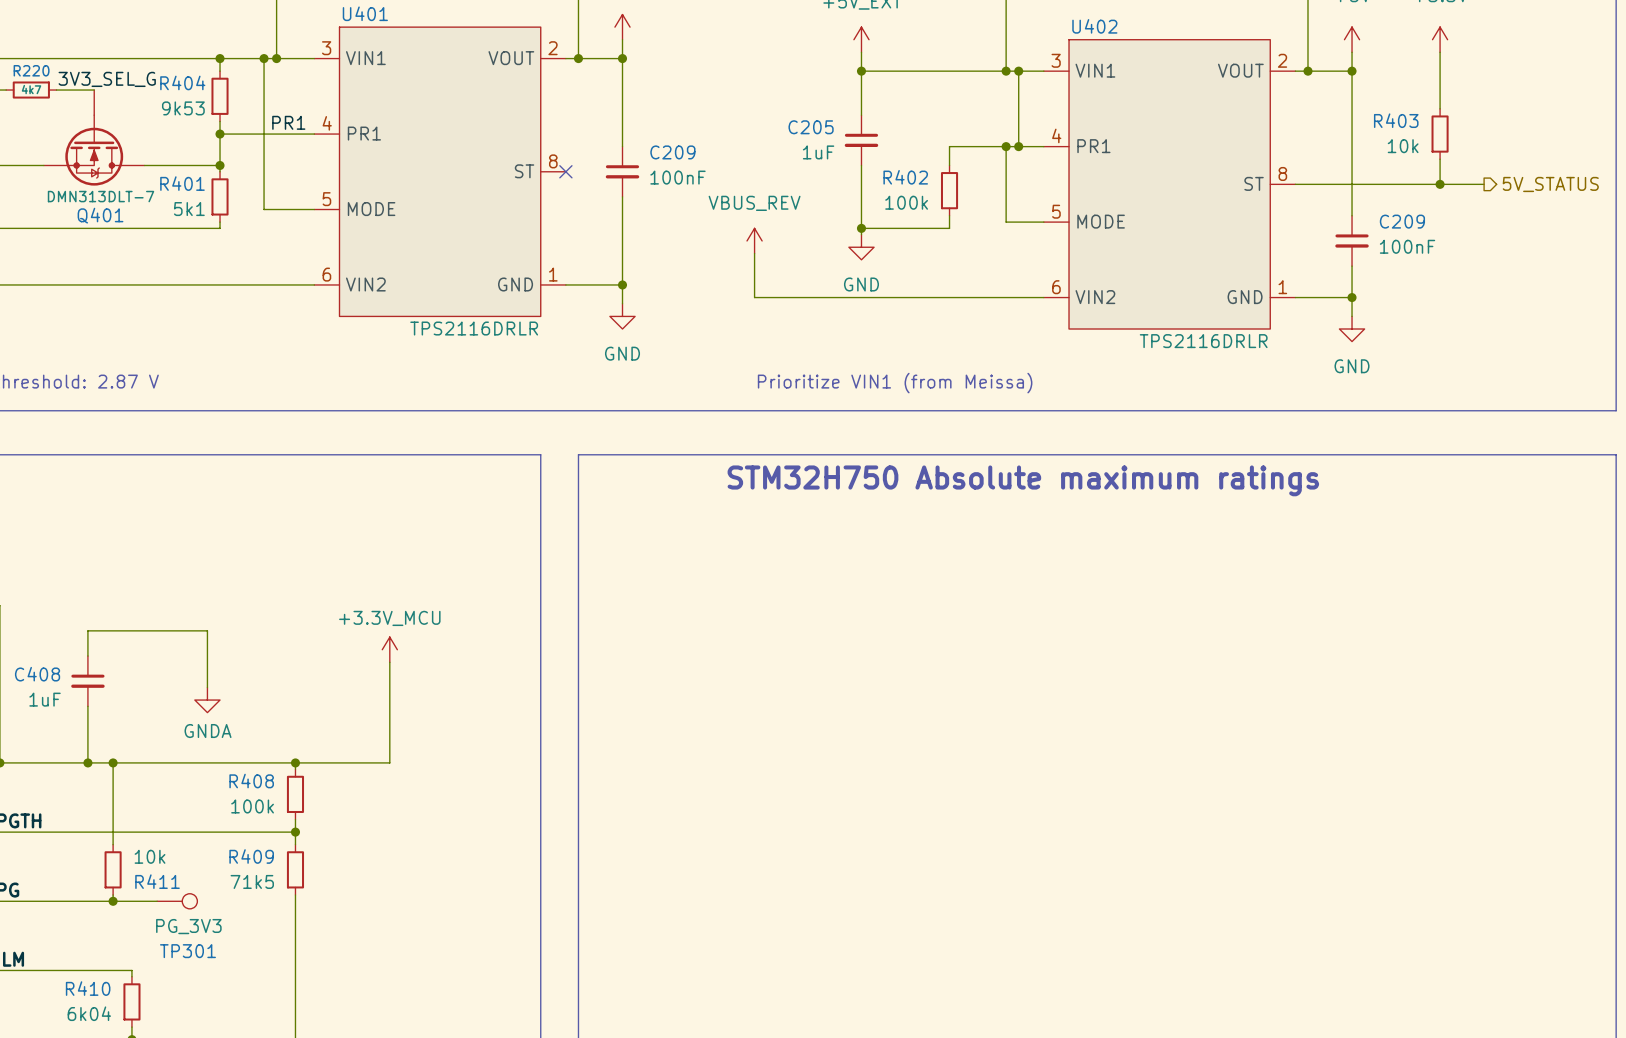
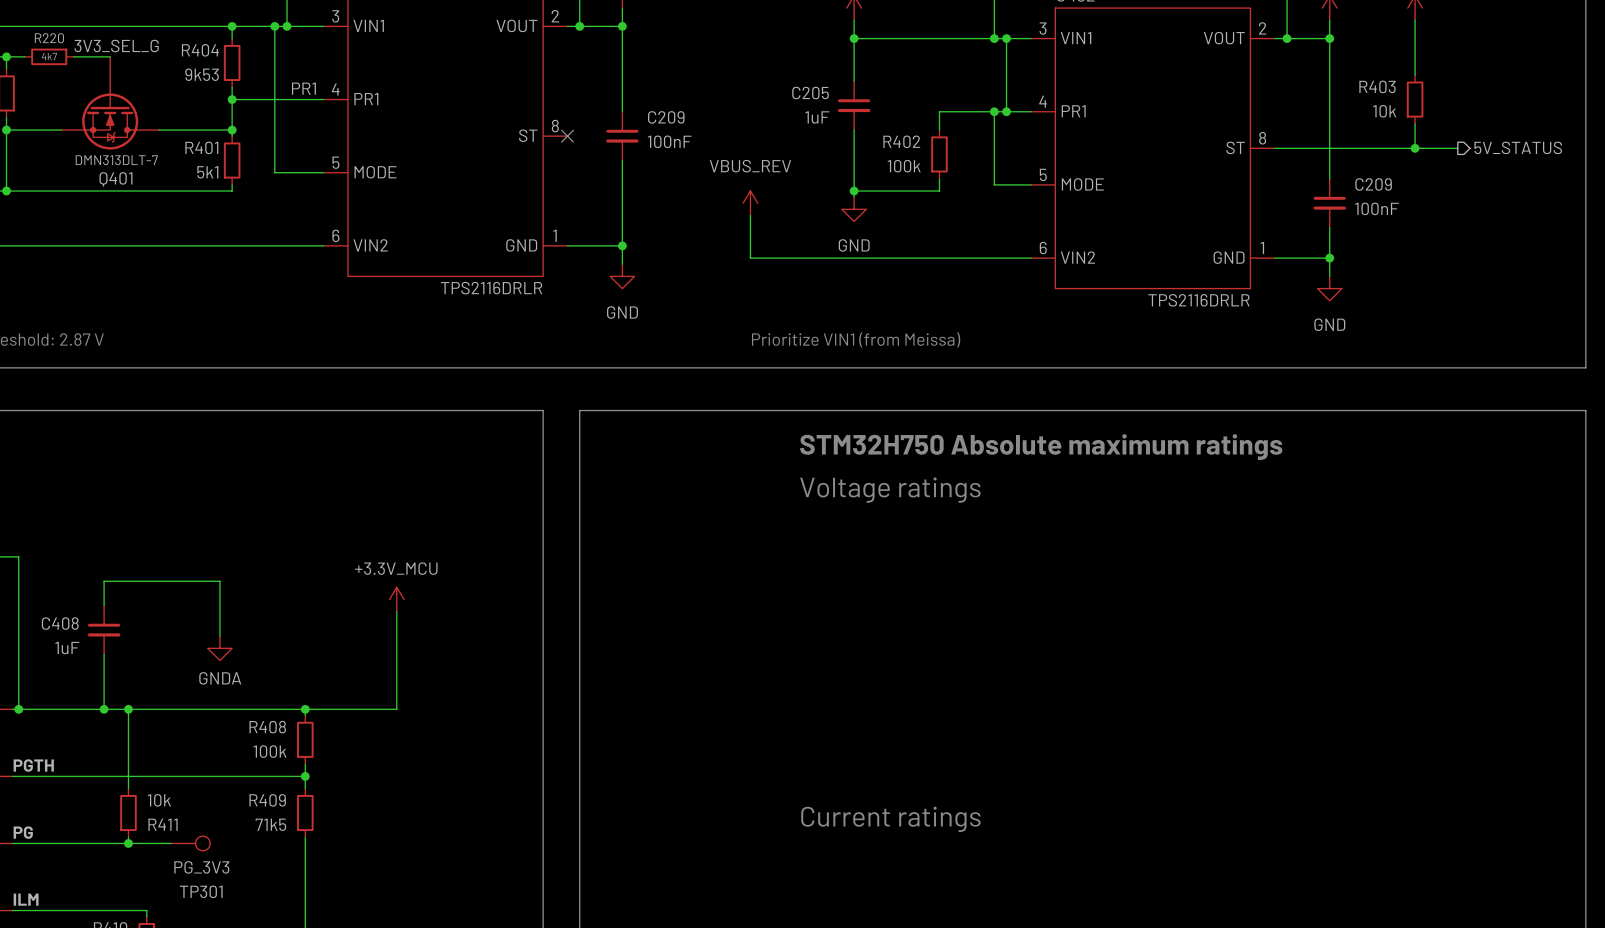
text position: STM32H750 Absolute maximum ratings (1023, 480) -> STM32H750 Absolute maximum ratings (1041, 447)
text: none -> Voltage ratings (890, 490)
text: none -> Current ratings (890, 819)

